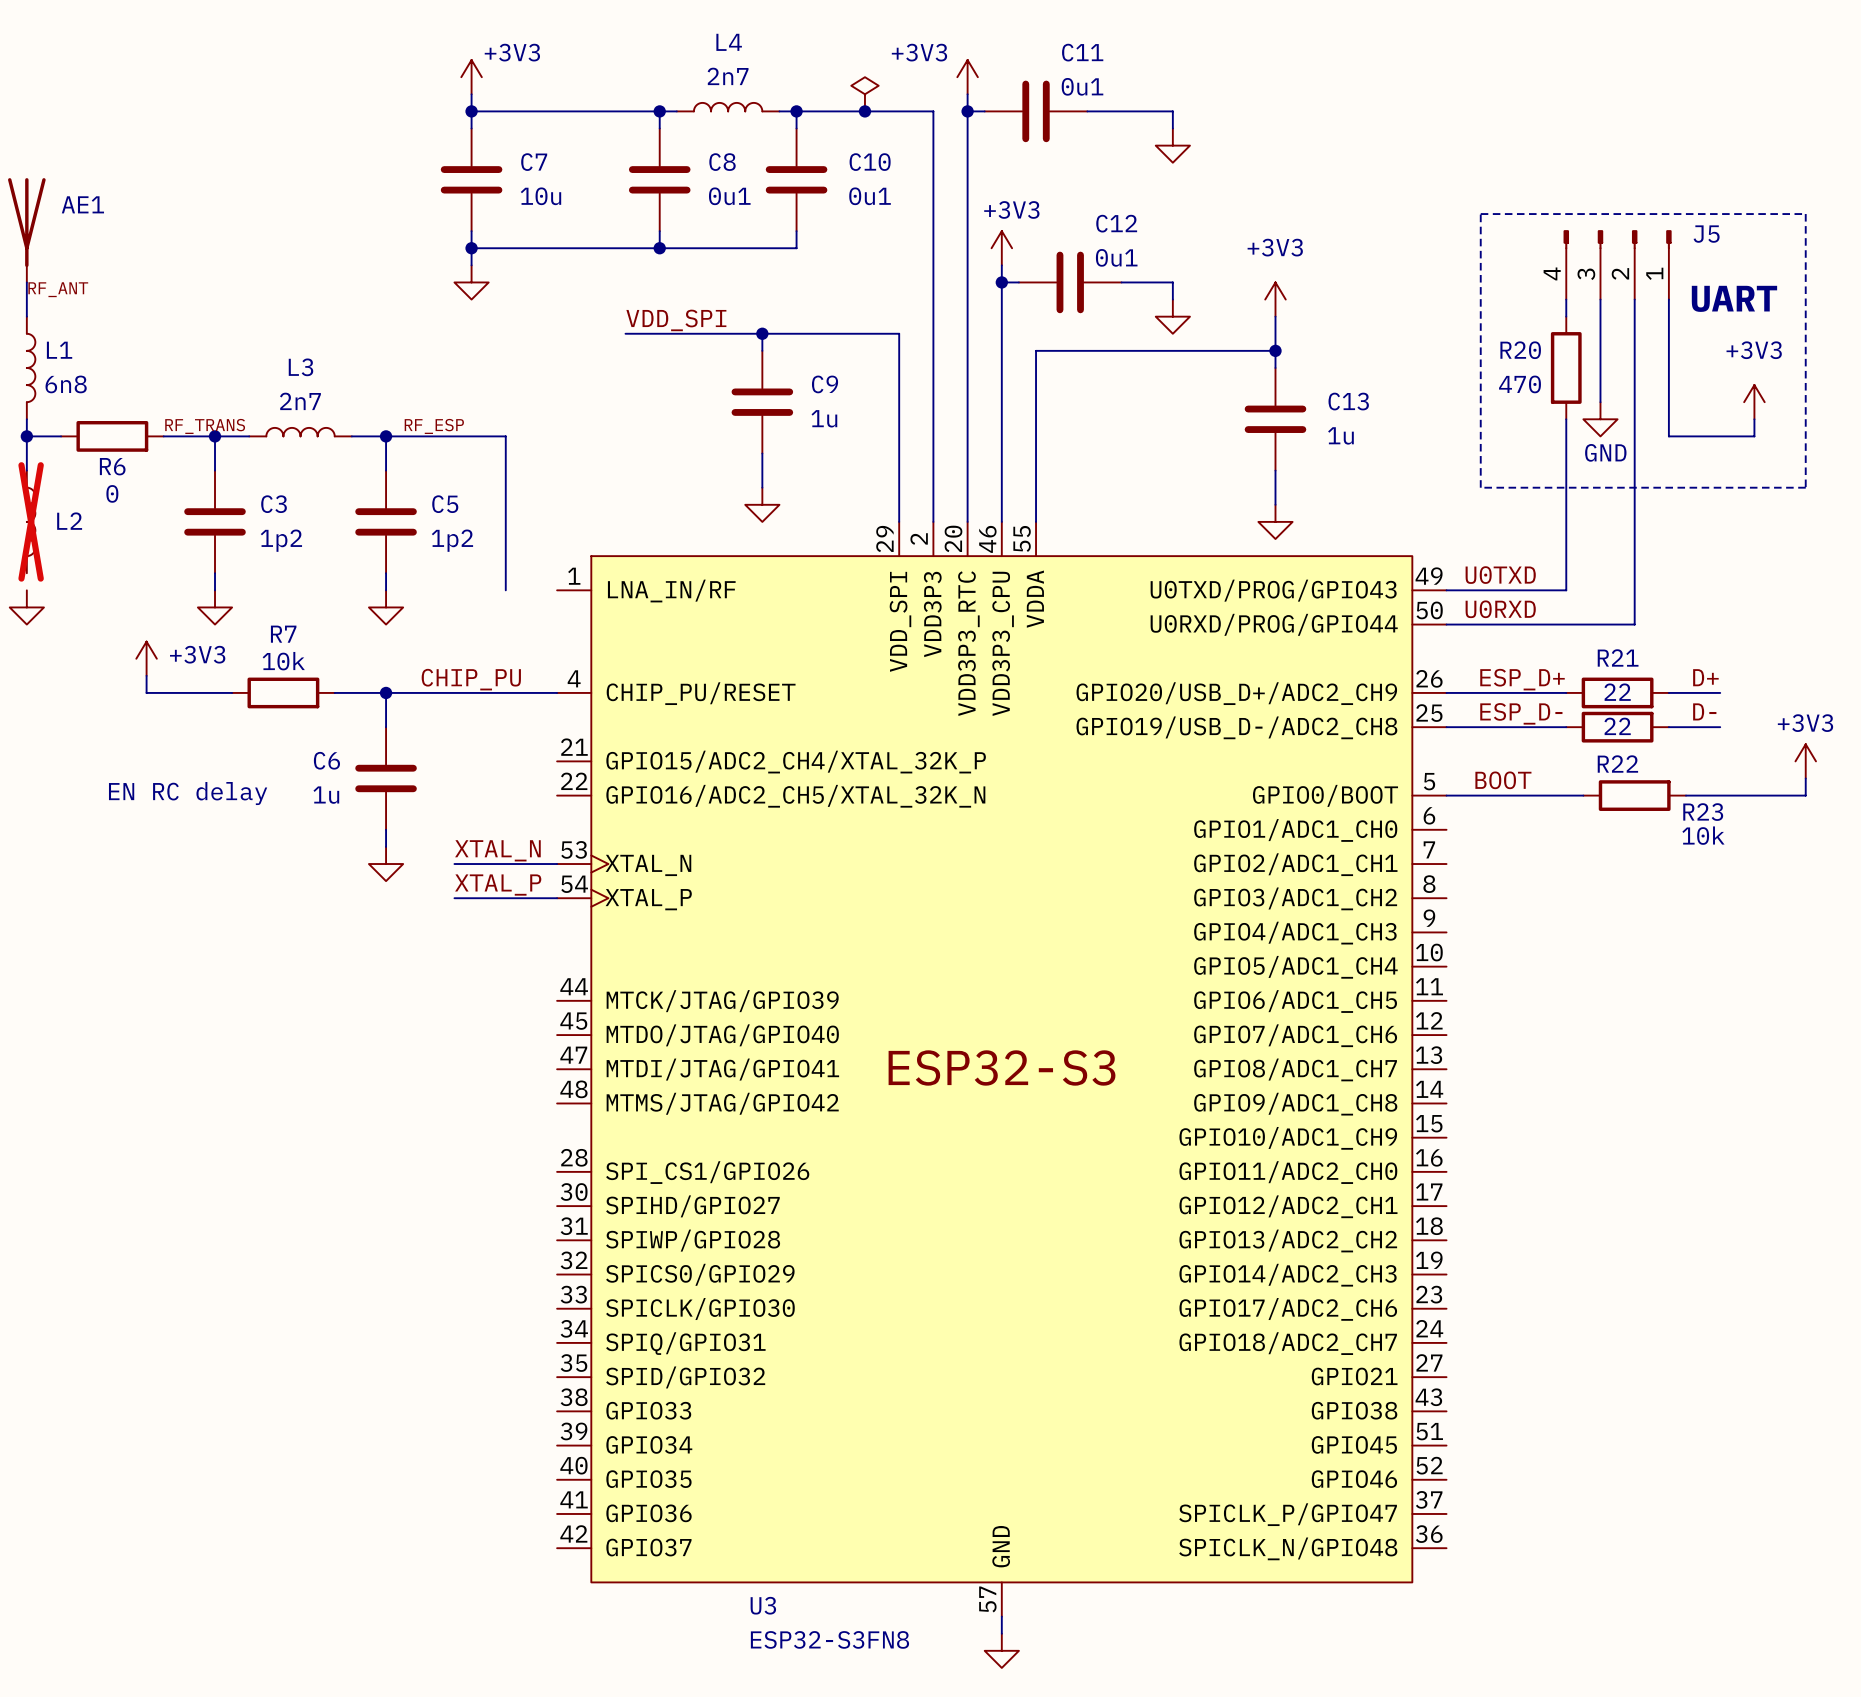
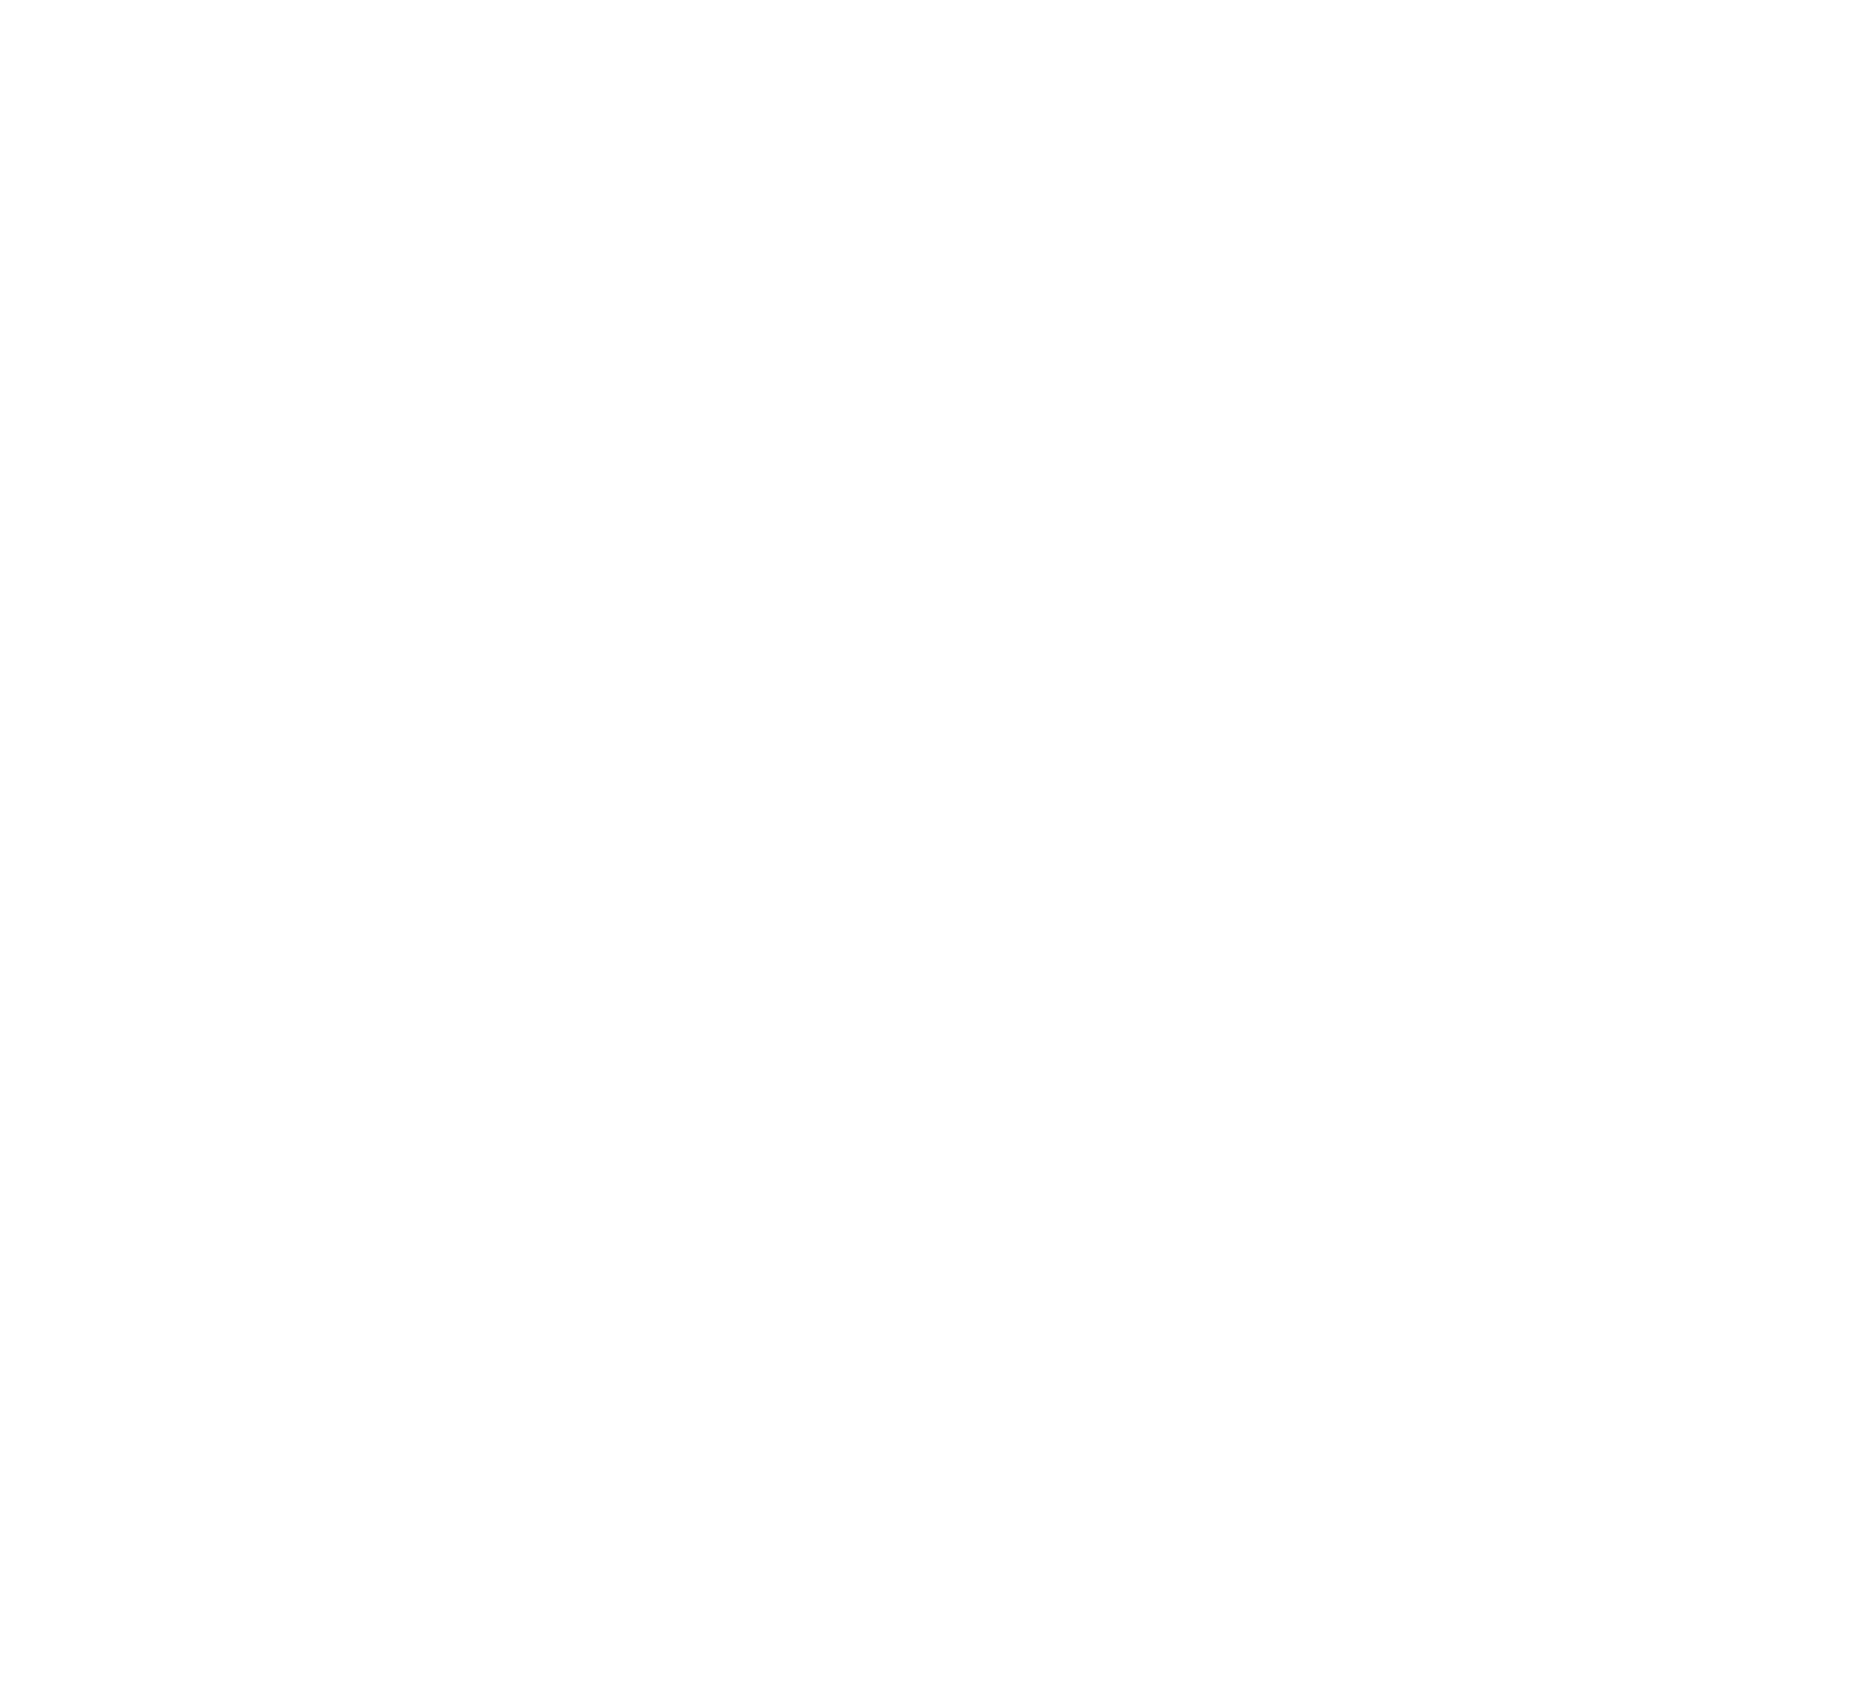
power symbol: +3V3 (471, 77) -> none
power symbol: +3V3 (967, 77) -> none
wire: (471, 94) (471, 128) -> none
power symbol: (864, 94) -> none
wire: (967, 94) (967, 521) -> none
L4: 2n7 (728, 107) -> none
wire: (471, 111) (676, 111) -> none
junction: (471, 111) -> none
wire: (659, 111) (659, 128) -> none
junction: (659, 111) -> none
wire: (779, 111) (933, 111) (933, 521) -> none
wire: (796, 111) (796, 128) -> none
junction: (796, 111) -> none
junction: (864, 111) -> none
wire: (967, 111) (984, 111) -> none
junction: (967, 111) -> none
C11: 0u1 (1036, 111) -> none
wire: (1087, 111) (1172, 111) (1172, 128) -> none
power symbol: (1172, 145) -> none
C7: 10u (471, 179) -> none
C8: 0u1 (659, 179) -> none
C10: 0u1 (796, 179) -> none
line: (1480, 214) (1805, 214) (1805, 487) (1480, 487) (1480, 214) -> none
AE1: (26, 230) -> none
wire: (471, 231) (471, 265) -> none
wire: (659, 231) (659, 248) -> none
wire: (796, 231) (796, 248) (471, 248) -> none
junction: (471, 248) -> none
junction: (659, 248) -> none
power symbol: +3V3 (1001, 248) -> none
J5: (1617, 264) -> none
wire: (1001, 265) (1001, 521) -> none
wire: (26, 282) (26, 316) -> none
power symbol: (471, 282) -> none
wire: (1001, 282) (1018, 282) -> none
junction: (1001, 282) -> none
C12: 0u1 (1070, 282) -> none
wire: (1121, 282) (1172, 282) (1172, 299) -> none
label: RF_ANT (58, 289) -> none
text: UART (1734, 298) -> none
power symbol: +3V3 (1275, 299) -> none
wire: (1566, 299) (1566, 316) -> none
wire: (1600, 299) (1600, 402) -> none
wire: (1634, 299) (1634, 624) (1446, 624) -> none
wire: (1668, 299) (1668, 436) (1754, 436) (1754, 419) -> none
power symbol: (1172, 316) -> none
wire: (1275, 316) (1275, 367) -> none
label: VDD_SPI (676, 320) -> none
wire: (625, 333) (899, 333) (899, 521) -> none
wire: (762, 333) (762, 350) -> none
junction: (762, 333) -> none
wire: (1275, 350) (1036, 350) (1036, 521) -> none
junction: (1275, 350) -> none
L1: 6n8 (31, 367) -> none
R20: 470 (1566, 367) -> none
C9: 1u (762, 402) -> none
power symbol: +3V3 (1754, 402) -> none
wire: (26, 419) (26, 470) -> none
C13: 1u (1275, 419) -> none
wire: (1566, 419) (1566, 590) (1446, 590) -> none
power symbol: GND (1600, 419) -> none
label: RF_TRANS (205, 426) -> none
label: RF_ESP (434, 426) -> none
L3: 2n7 (300, 432) -> none
wire: (26, 436) (61, 436) -> none
junction: (26, 436) -> none
R6: 0 (112, 436) -> none
wire: (163, 436) (249, 436) -> none
wire: (215, 436) (215, 470) -> none
junction: (215, 436) -> none
wire: (351, 436) (505, 436) (505, 590) -> none
wire: (386, 436) (386, 470) -> none
junction: (386, 436) -> none
wire: (762, 453) (762, 487) -> none
wire: (1275, 470) (1275, 504) -> none
power symbol: (762, 504) -> none
L2: (31, 521) -> none
C3: 1p2 (215, 521) -> none
C5: 1p2 (386, 521) -> none
power symbol: (1275, 521) -> none
wire: (215, 573) (215, 590) -> none
wire: (386, 573) (386, 590) -> none
label: U0TXD (1500, 575) -> none
power symbol: (26, 607) -> none
power symbol: (215, 607) -> none
power symbol: (386, 607) -> none
label: U0RXD (1500, 609) -> none
power symbol: +3V3 (146, 658) -> none
wire: (146, 675) (146, 692) (232, 692) -> none
label: D+ (1705, 677) -> none
label: CHIP_PU (471, 679) -> none
label: ESP_D+ (1522, 679) -> none
R7: 10k (283, 692) -> none
wire: (334, 692) (557, 692) -> none
wire: (386, 692) (386, 727) -> none
junction: (386, 692) -> none
wire: (1446, 692) (1566, 692) -> none
R21: 22 (1617, 692) -> none
wire: (1668, 692) (1720, 692) -> none
label: D- (1704, 711) -> none
label: ESP_D- (1521, 713) -> none
wire: (1446, 727) (1566, 727) -> none
R22: 22 (1617, 727) -> none
wire: (1668, 727) (1720, 727) -> none
power symbol: +3V3 (1805, 761) -> none
C6: 1u (386, 778) -> none
wire: (1805, 778) (1805, 795) (1686, 795) -> none
label: BOOT (1503, 780) -> none
text: EN RC delay (188, 793) -> none
wire: (1446, 795) (1583, 795) -> none
R23: 10k (1634, 795) -> none
wire: (386, 829) (386, 846) -> none
label: XTAL_N (497, 850) -> none
power symbol: (386, 864) -> none
wire: (454, 864) (557, 864) -> none
label: XTAL_P (498, 885) -> none
wire: (454, 898) (557, 898) -> none
U3: ESP32-S3FN8 (1001, 1069) -> none
wire: (1001, 1616) (1001, 1633) -> none
power symbol: (1001, 1650) -> none

